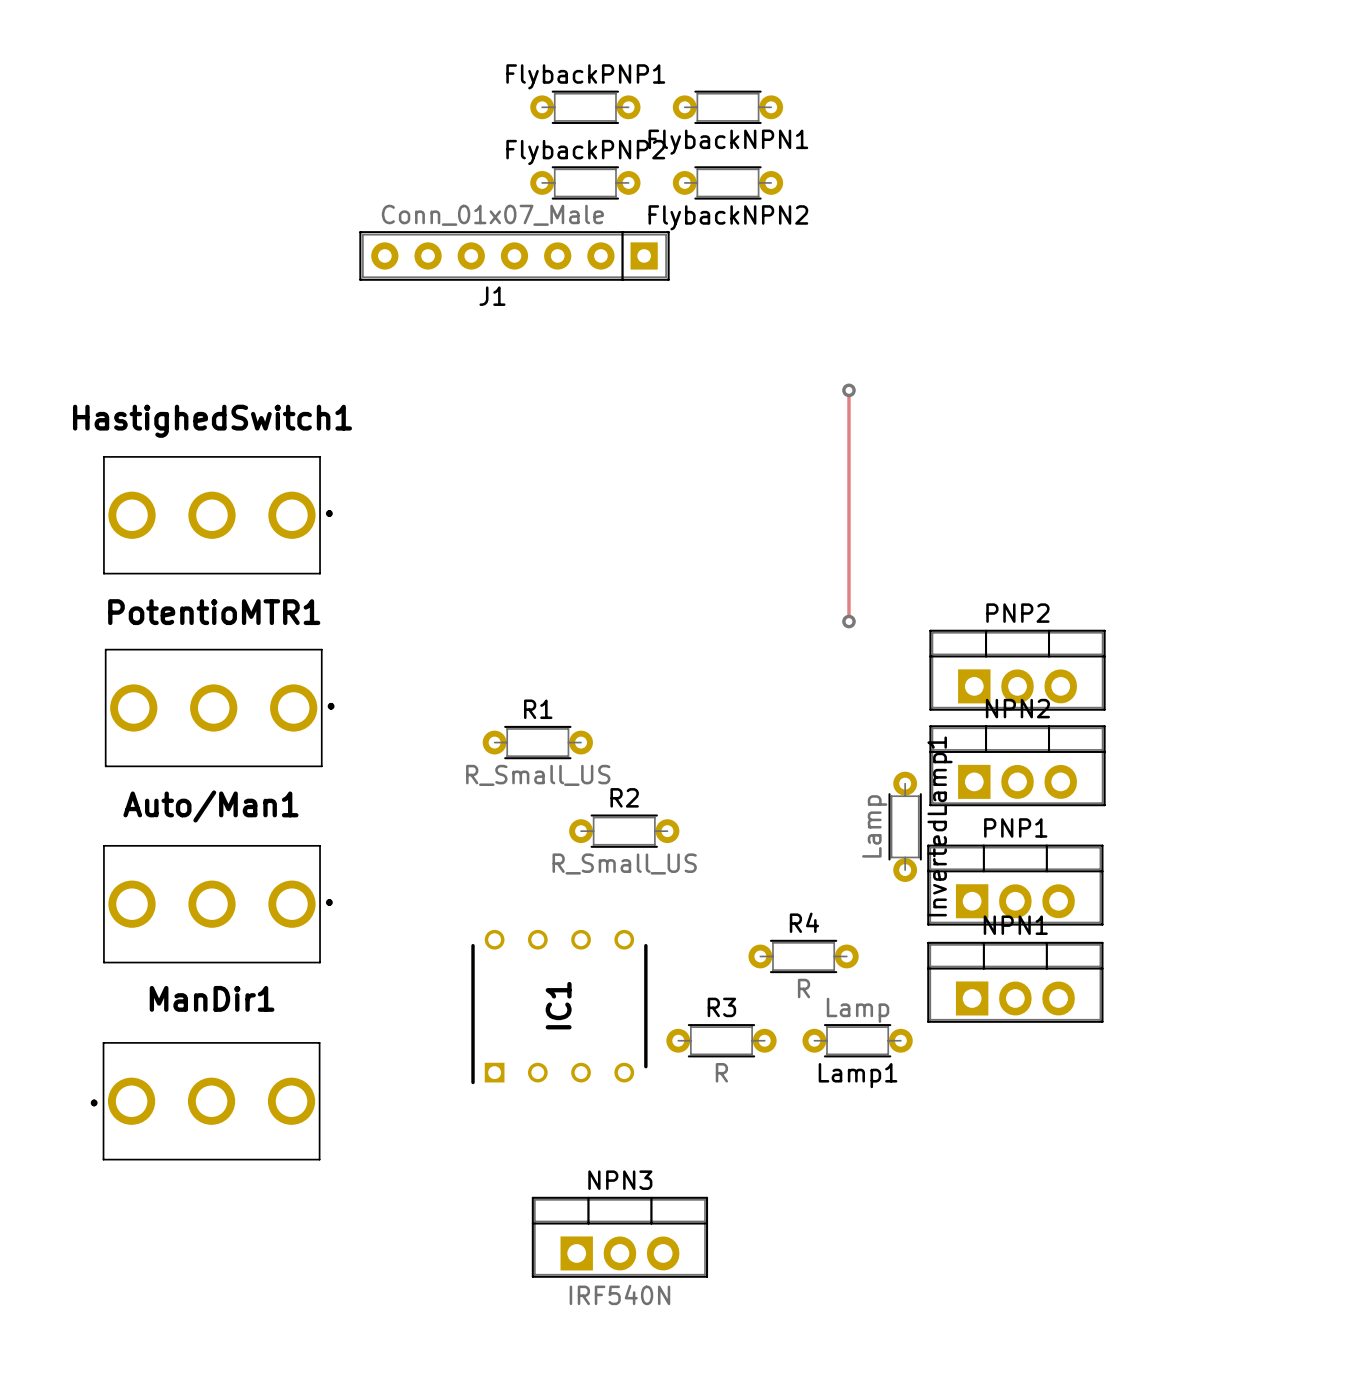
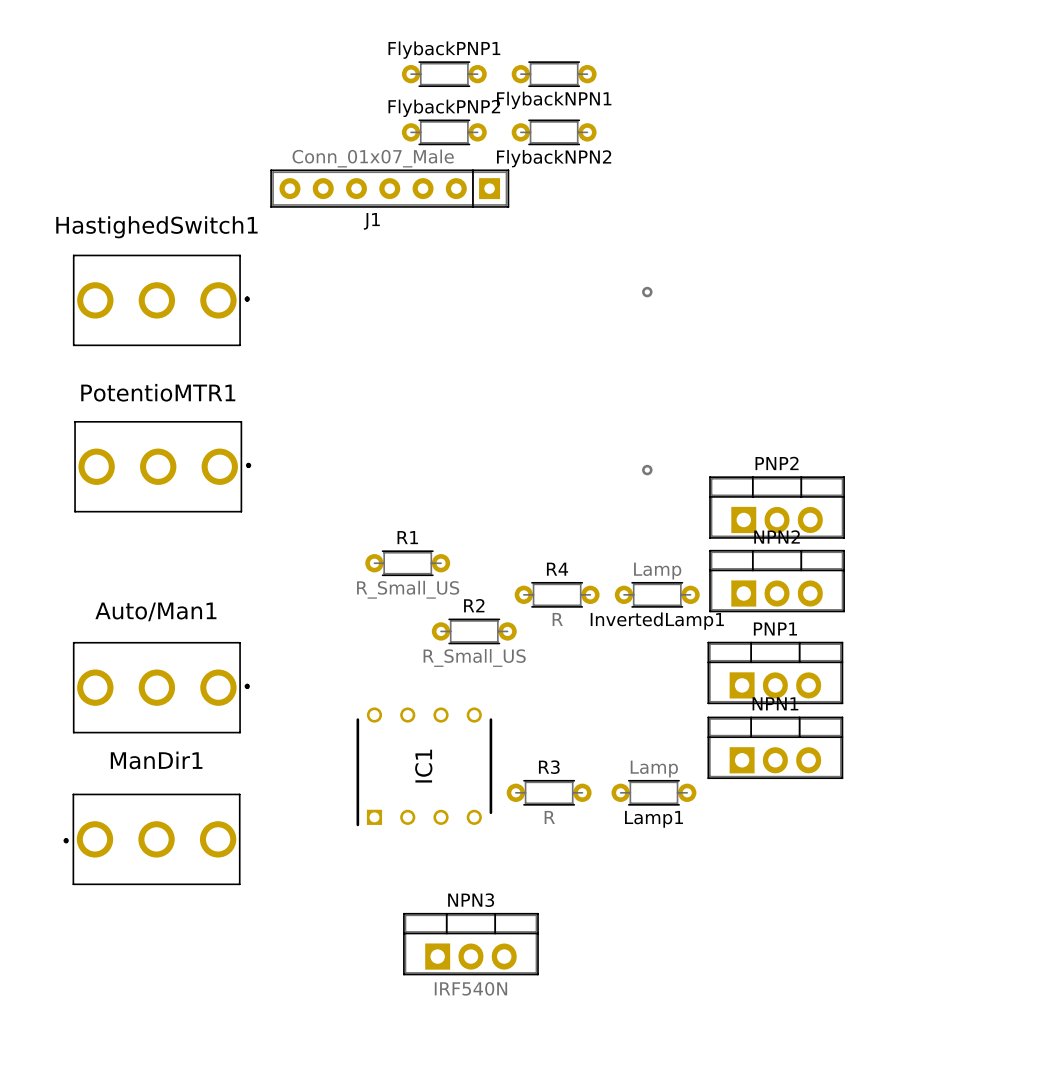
track: (848, 390) (848, 621) -> none
HastighedSwitch1 position: (217, 515) -> (161, 300)
PotentioMTR1 position: (219, 707) -> (162, 466)
InvertedLamp1 rotation: 0° (905, 826) -> 90° clockwise (657, 594)
R4 position: (803, 956) -> (557, 594)

